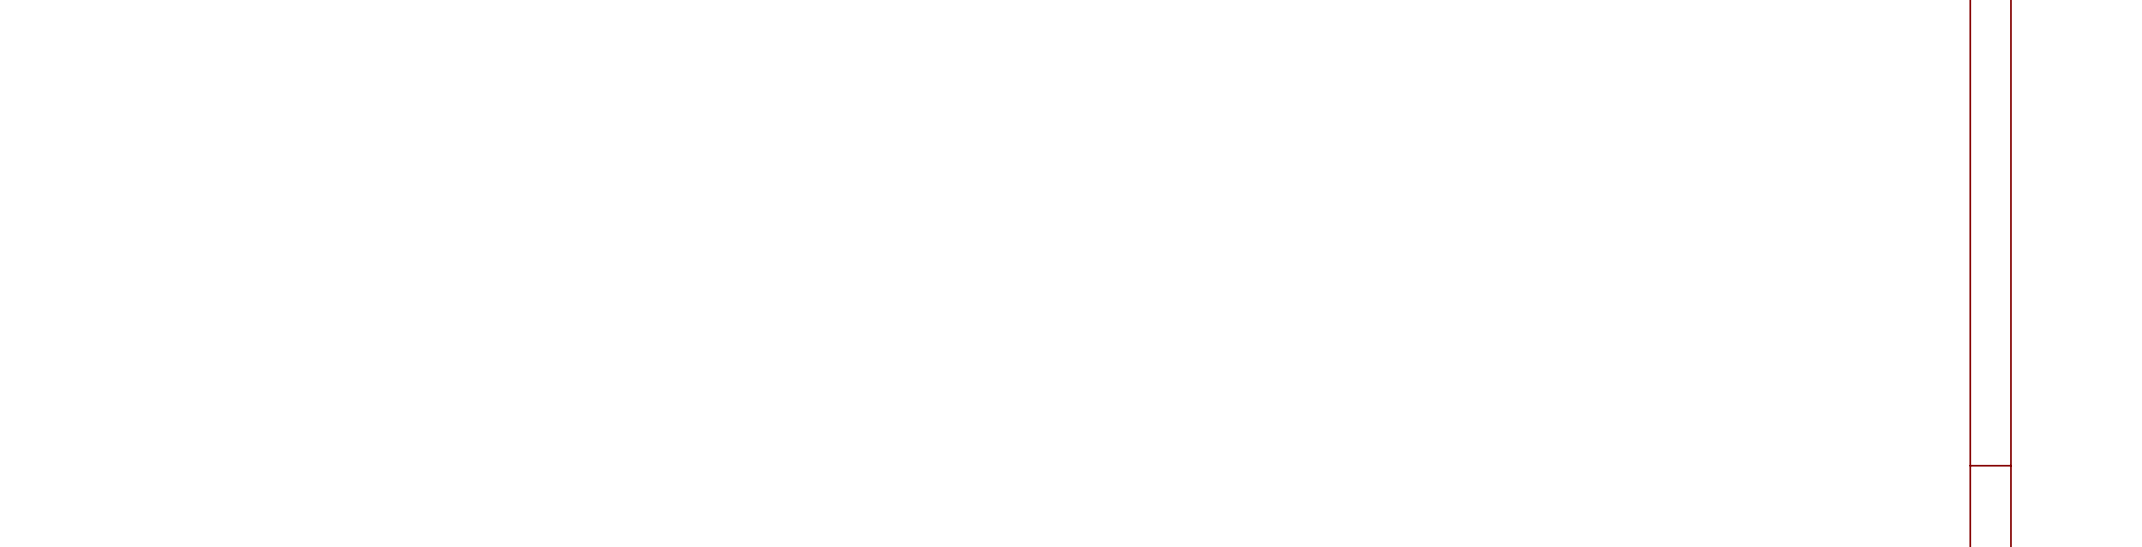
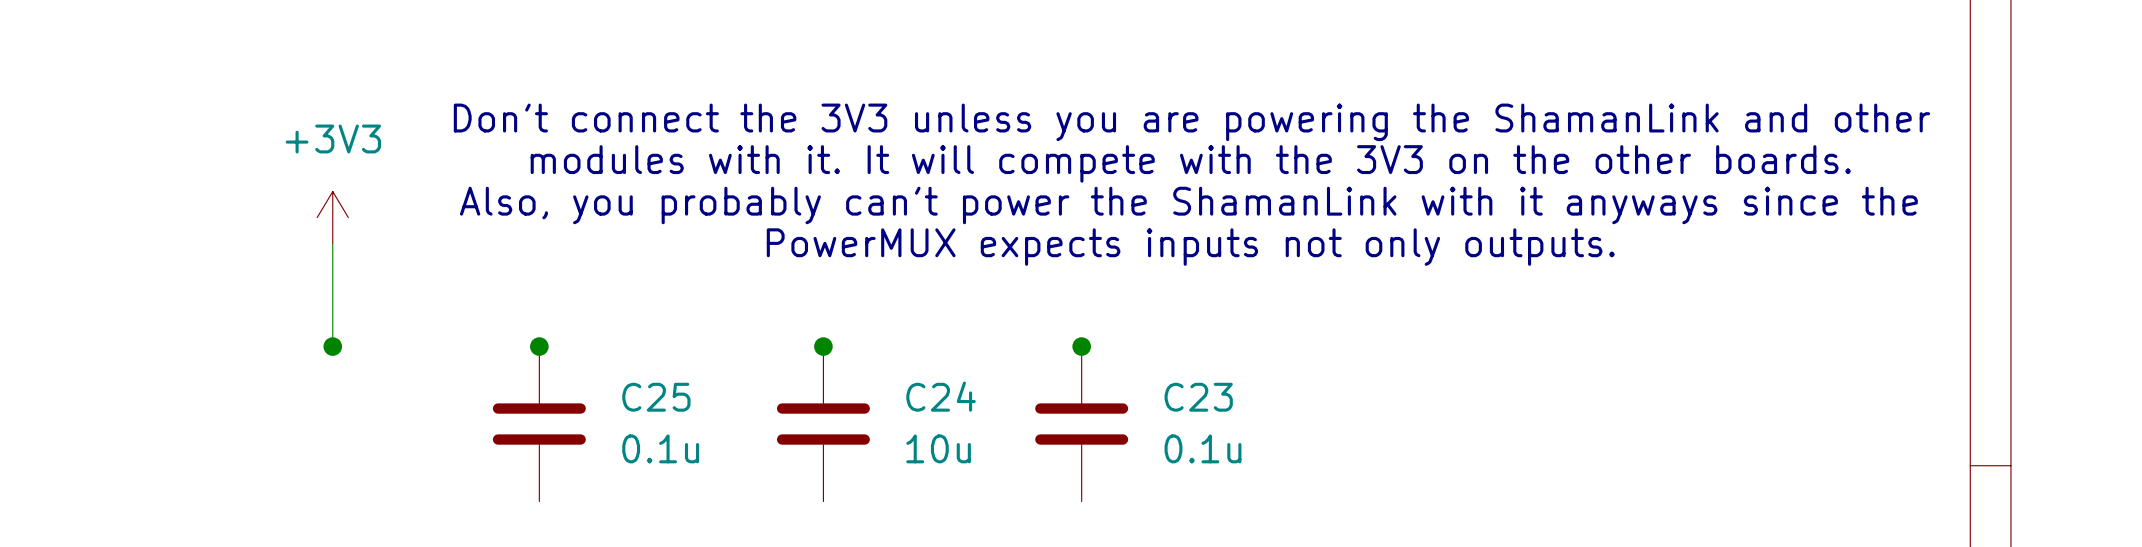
text: none -> Don't connect the 3V3 unless you are powering the ShamanLink and other (1191, 122)
text: none -> modules with it. It will compete with the 3V3 on the other boards. (1190, 163)
text: none -> Also, you probably can't power the ShamanLink with it anyways since the (1188, 205)
power symbol: none -> +3V3 (332, 217)
wire: none -> (332, 243) (332, 346)
text: none -> PowerMUX expects inputs not only outputs. (1190, 247)
junction: none -> (332, 346)
junction: none -> (539, 346)
junction: none -> (823, 346)
junction: none -> (1081, 346)
C25: none -> 0.1u (539, 424)
C24: none -> 10u (823, 424)
C23: none -> 0.1u (1081, 424)

